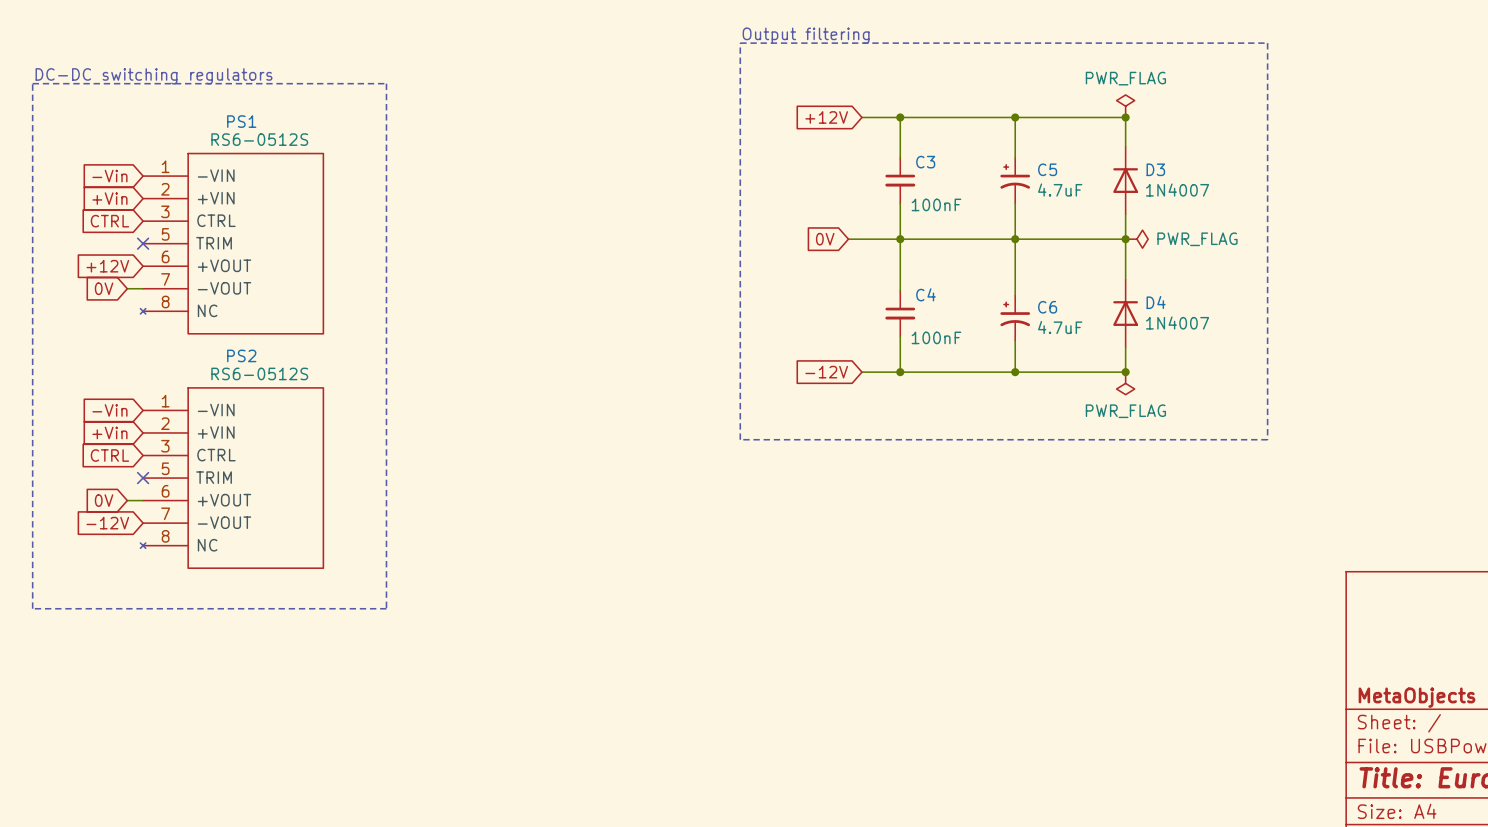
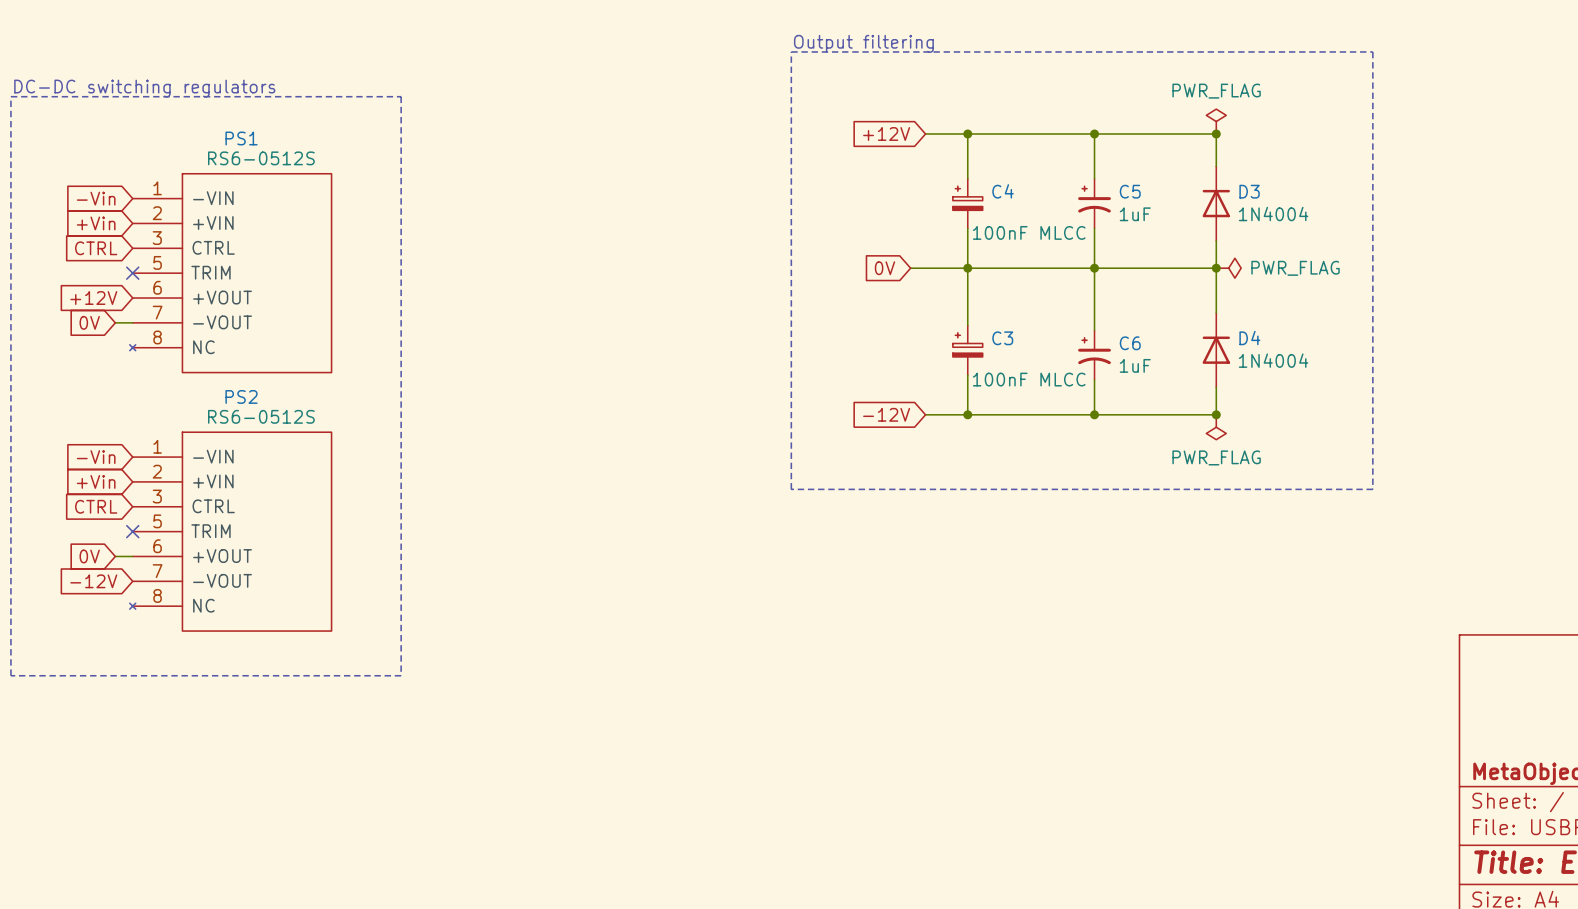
C3 symbol: [885, 158, 916, 204] -> [952, 325, 983, 376]
C5 value: 4.7uF (1060, 190) -> 1uF (1135, 214)
D3 value: 1N4007 (1177, 190) -> 1N4004 (1273, 214)
C3 value: 100nF (936, 204) -> 100nF MLCC (1029, 379)
C4 symbol: [885, 291, 916, 337] -> [952, 178, 983, 229]
D4 value: 1N4007 (1177, 322) -> 1N4004 (1273, 360)
C6 value: 4.7uF (1060, 327) -> 1uF (1135, 365)
C4 value: 100nF (936, 337) -> 100nF MLCC (1029, 232)

